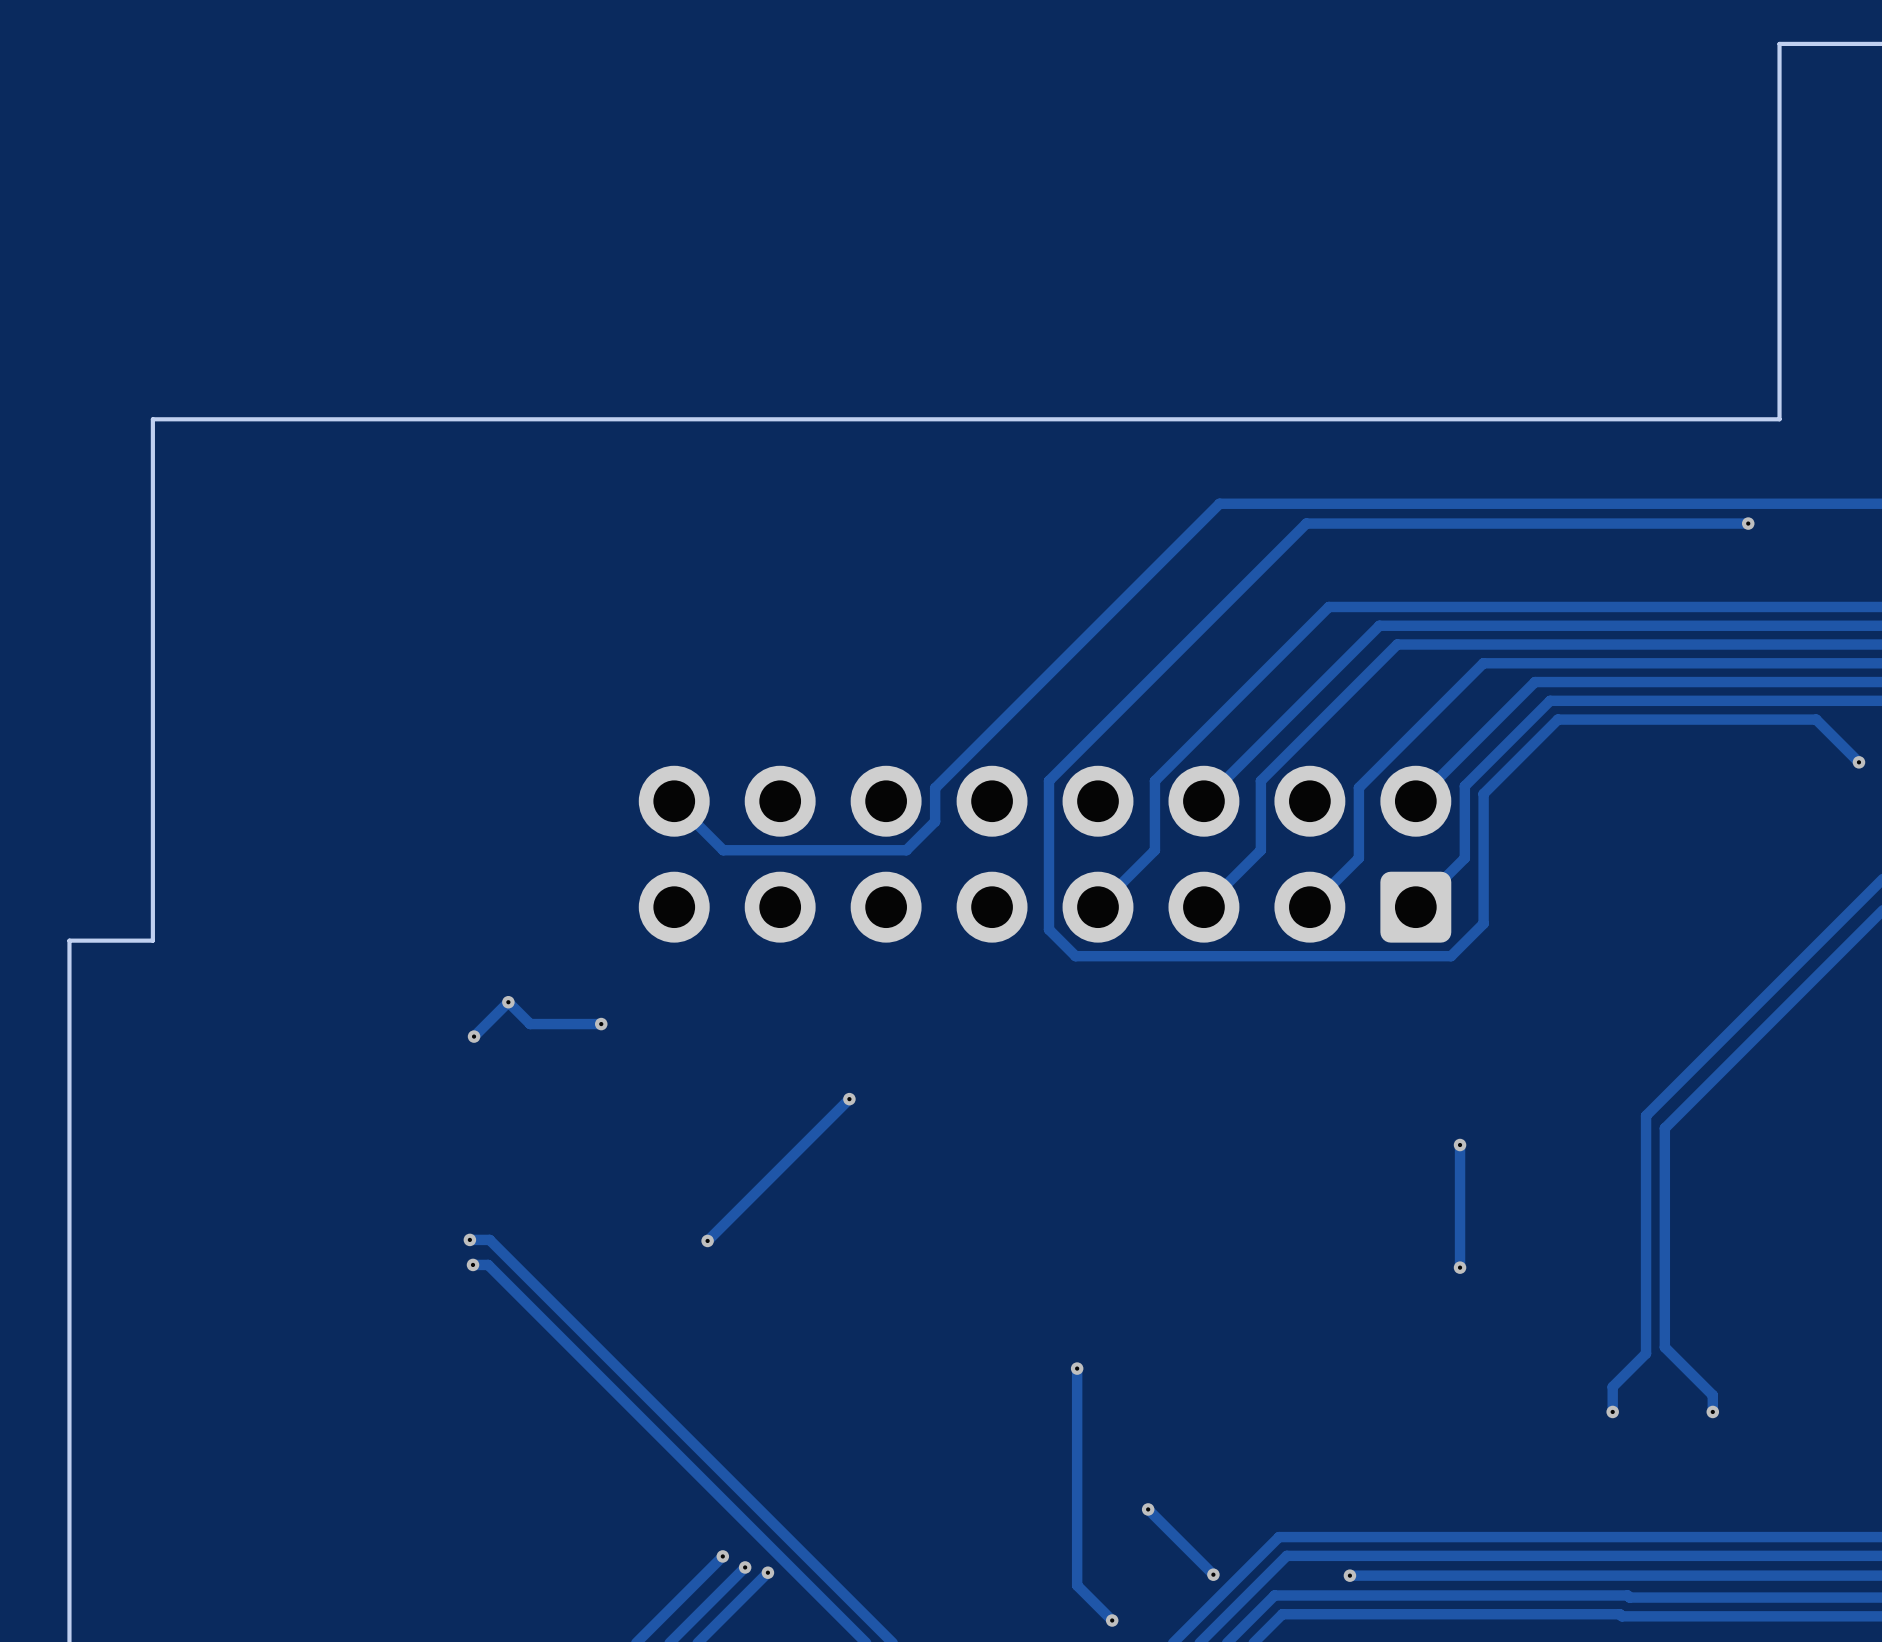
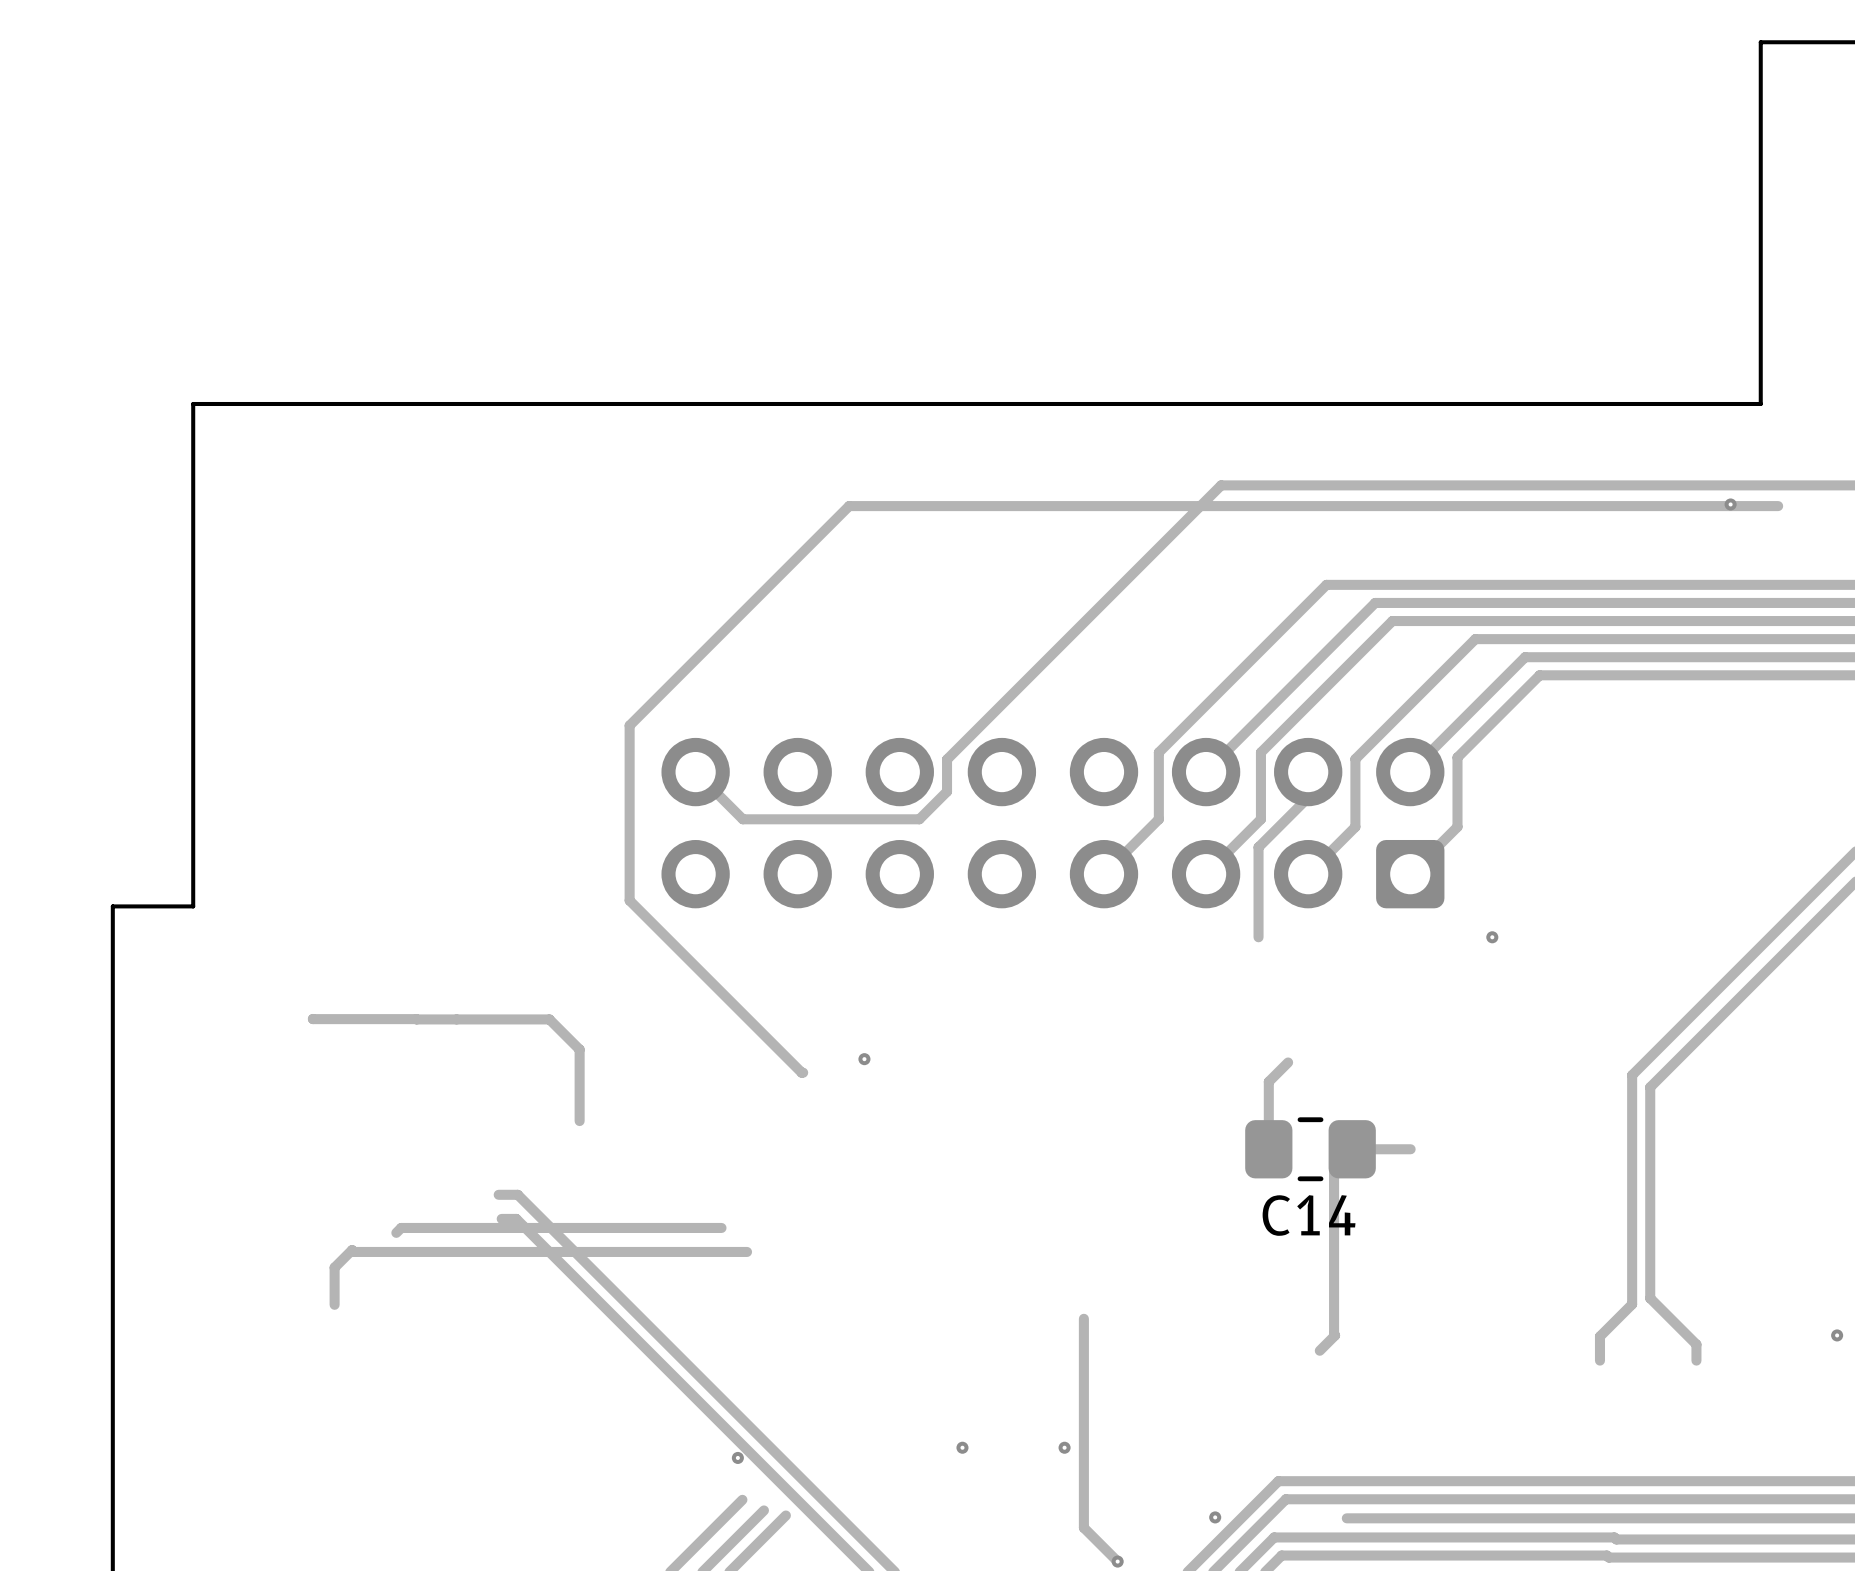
track: (1748, 523) (1306, 523) (1049, 780) (1049, 929) (1075, 956) (1451, 956) (1483, 923) (1483, 793) (1557, 719) (1816, 719) (1858, 762) -> none
track: none -> (1778, 506) (849, 506) (629, 725) (629, 900) (803, 1072)
via: (1858, 762) -> none
track: none -> (1308, 772) (1308, 797) (1258, 847) (1258, 937)
via: none -> (1492, 937)
via: (508, 1002) -> none
track: (601, 1024) (530, 1024) (508, 1002) (474, 1036) -> none
via: (601, 1024) -> none
via: (474, 1036) -> none
track: none -> (416, 1019) (312, 1019)
track: none -> (416, 1019) (549, 1019) (579, 1049) (579, 1121)
track: (849, 1099) (707, 1240) -> none
track: none -> (1288, 1062) (1268, 1081) (1268, 1149)
track: (1460, 1145) (1460, 1267) -> none
via: (1460, 1145) -> none
C14: none -> (1310, 1149)
track: none -> (1410, 1149) (1352, 1149) (1334, 1167) (1335, 1335) (1319, 1350)
via: (469, 1239) -> none
via: (707, 1240) -> none
via: (473, 1264) -> none
via: (1460, 1267) -> none
track: none -> (721, 1227) (401, 1227) (396, 1232)
track: none -> (747, 1251) (353, 1251) (352, 1250) (334, 1267) (334, 1304)
via: (1077, 1368) -> none
via: none -> (1837, 1335)
via: (1612, 1411) -> none
via: (1712, 1411) -> none
via: none -> (962, 1447)
via: none -> (1064, 1447)
track: (1148, 1509) (1213, 1574) -> none
via: (1148, 1509) -> none
via: none -> (737, 1457)
via: (722, 1556) -> none
via: (745, 1567) -> none
via: (767, 1572) -> none
via: (1349, 1575) -> none

